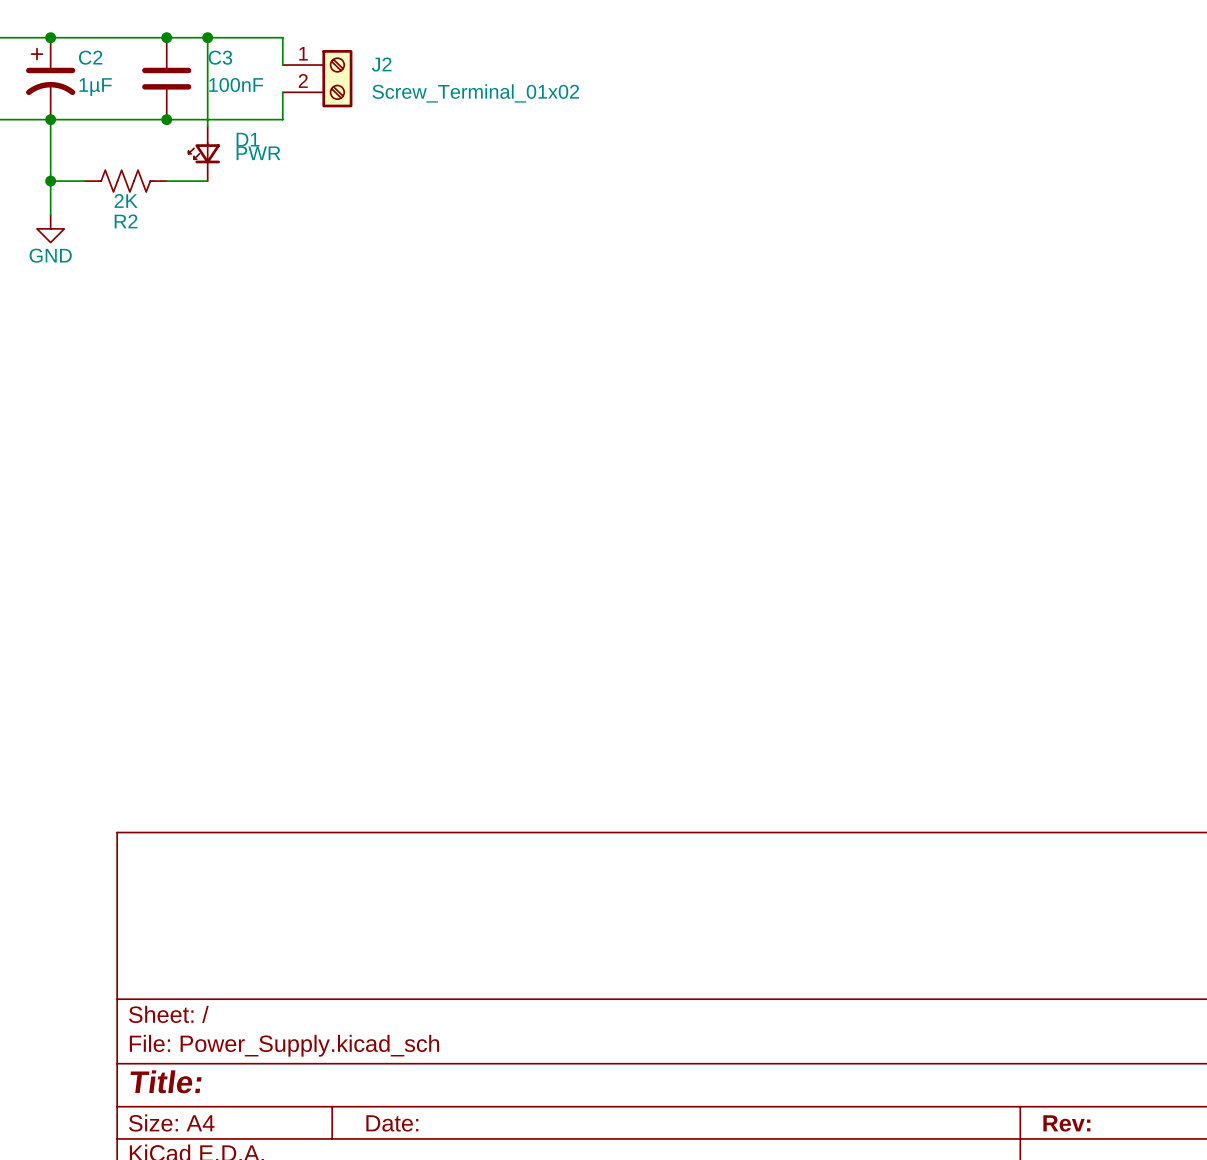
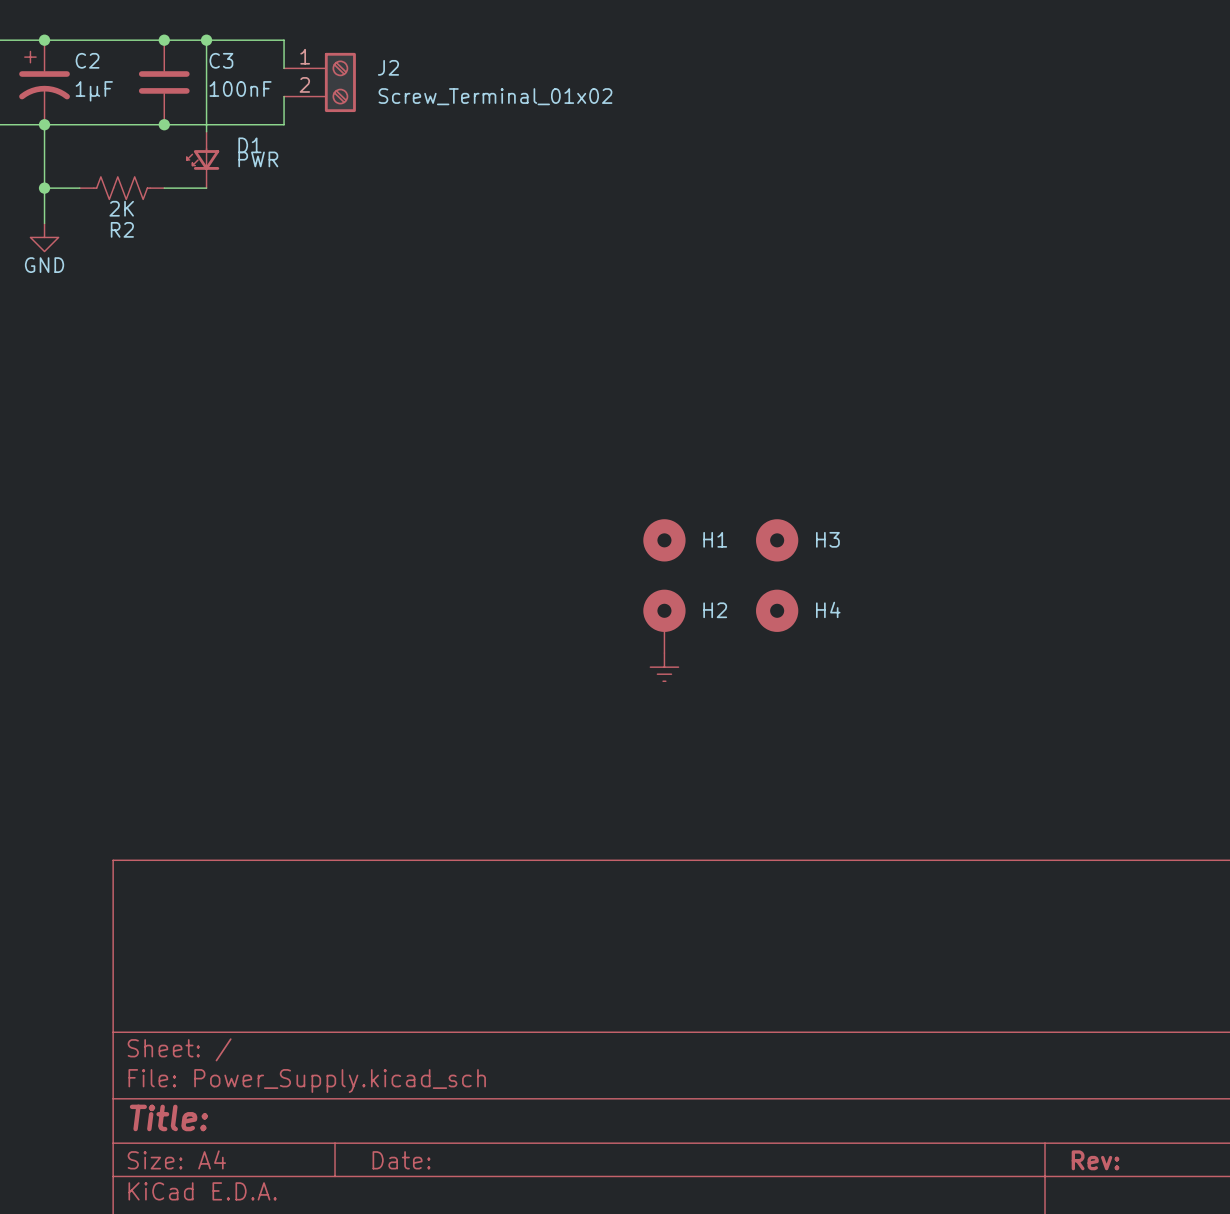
H1: none -> (664, 540)
H3: none -> (777, 540)
H4: none -> (777, 610)
H2: none -> (664, 621)
power symbol: none -> (664, 667)

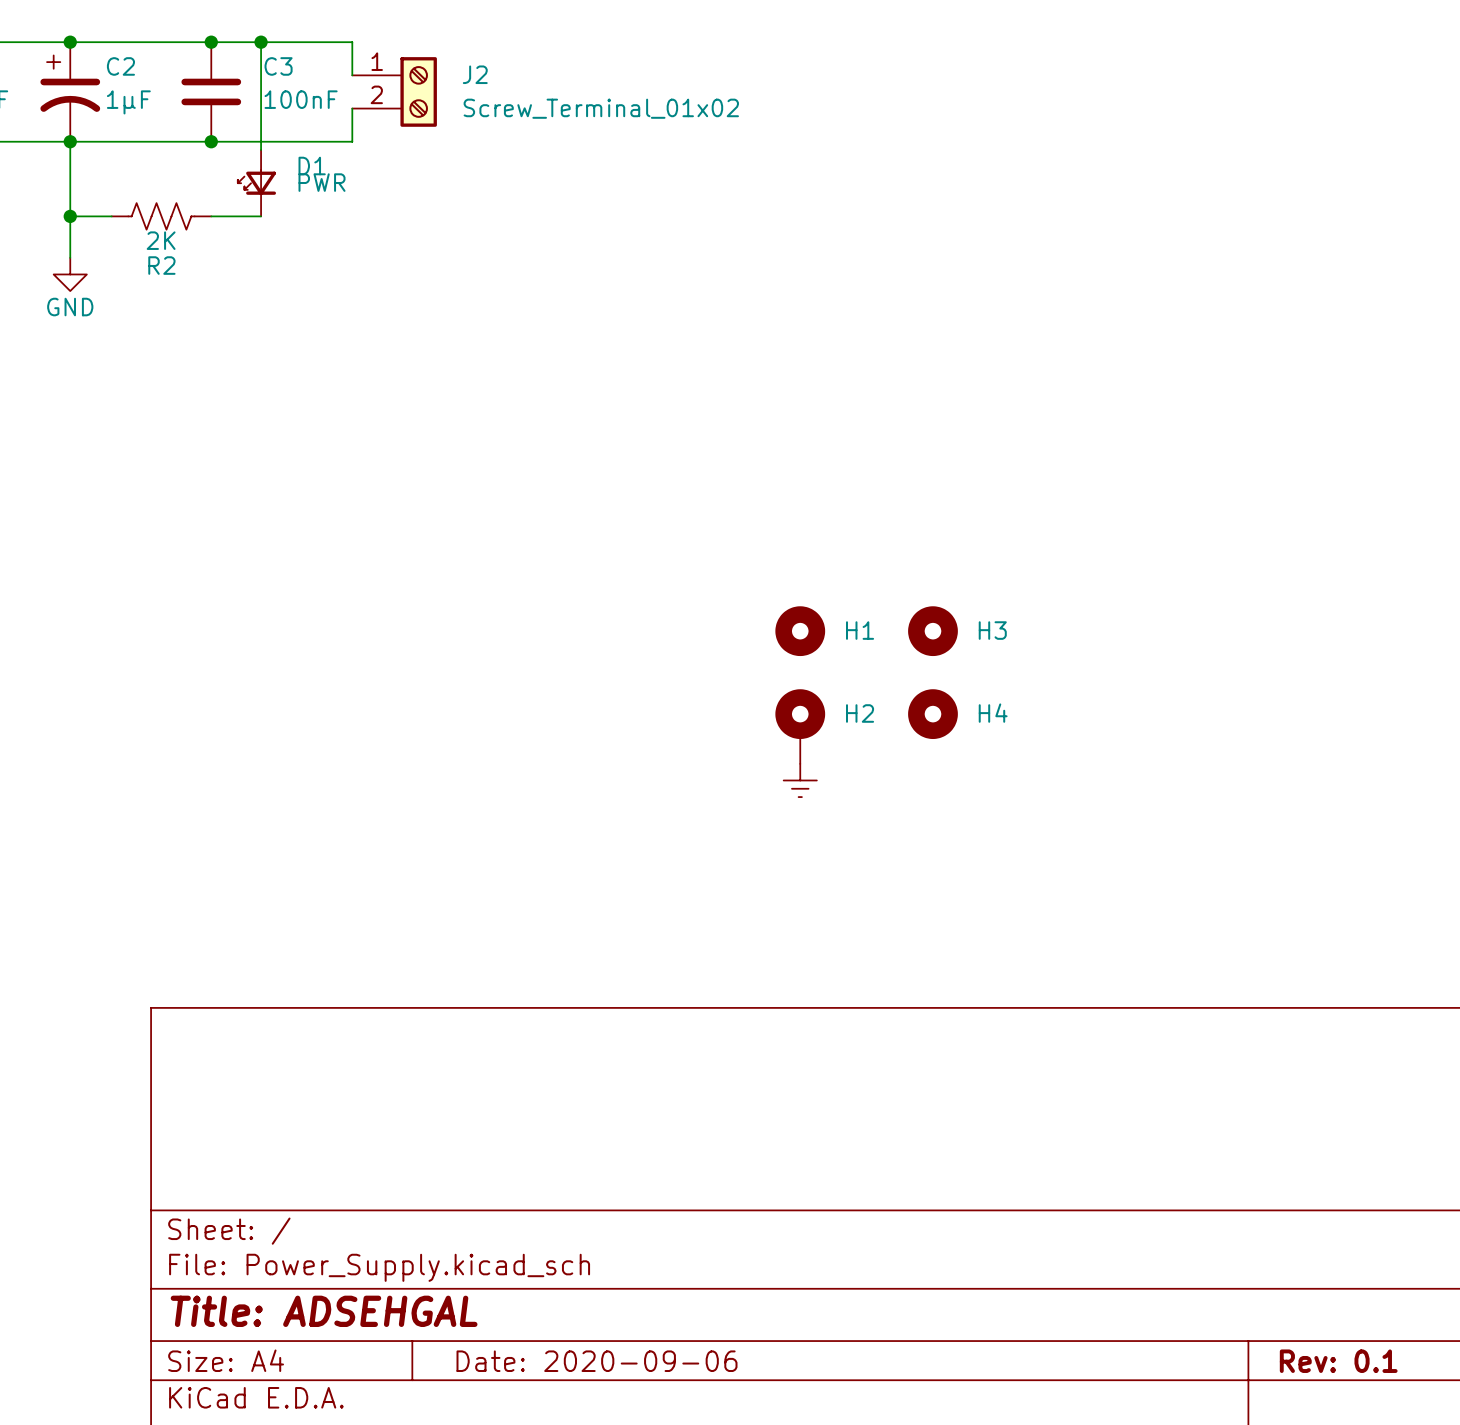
title block: Title: (168, 1117) -> Title: ADSEHGAL (324, 1311)
title block: Date: (401, 1160) -> Date: 2020-09-06 (597, 1361)
title block: Rev: (1095, 1160) -> Rev: 0.1 (1338, 1361)

